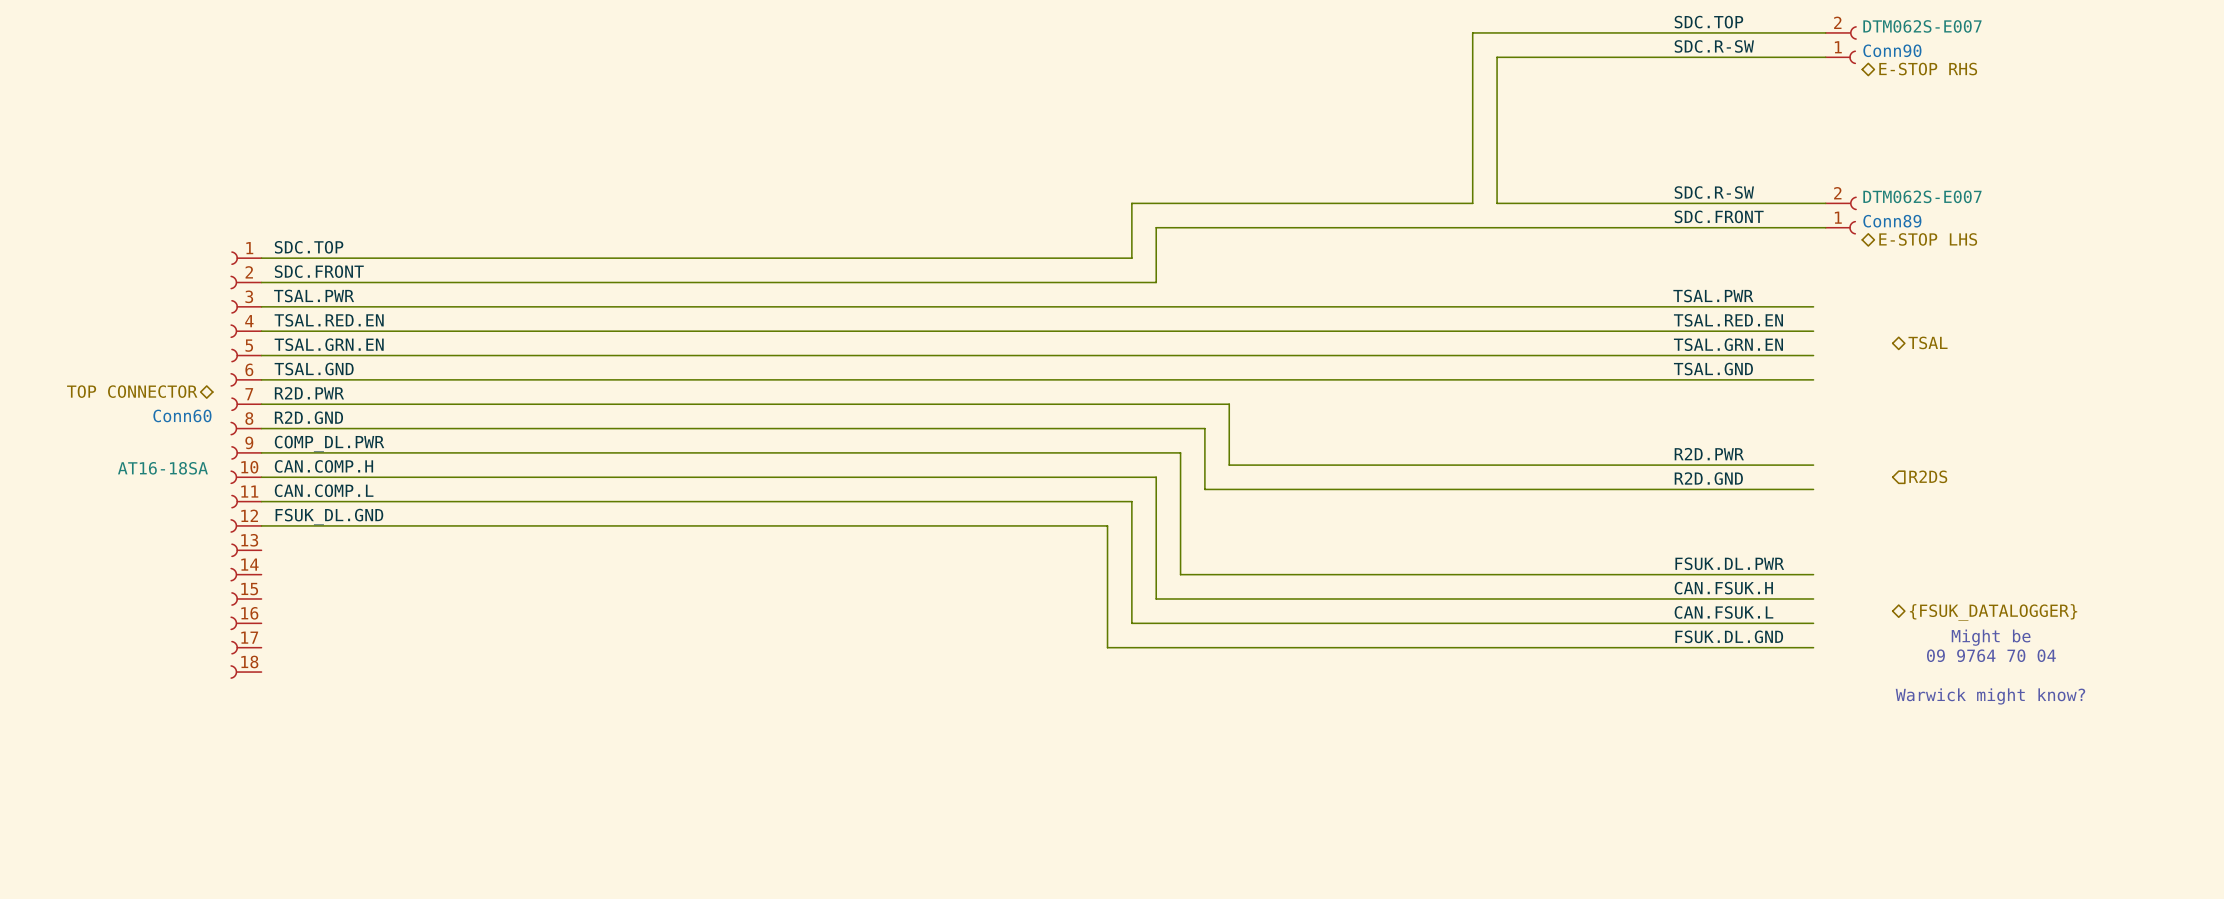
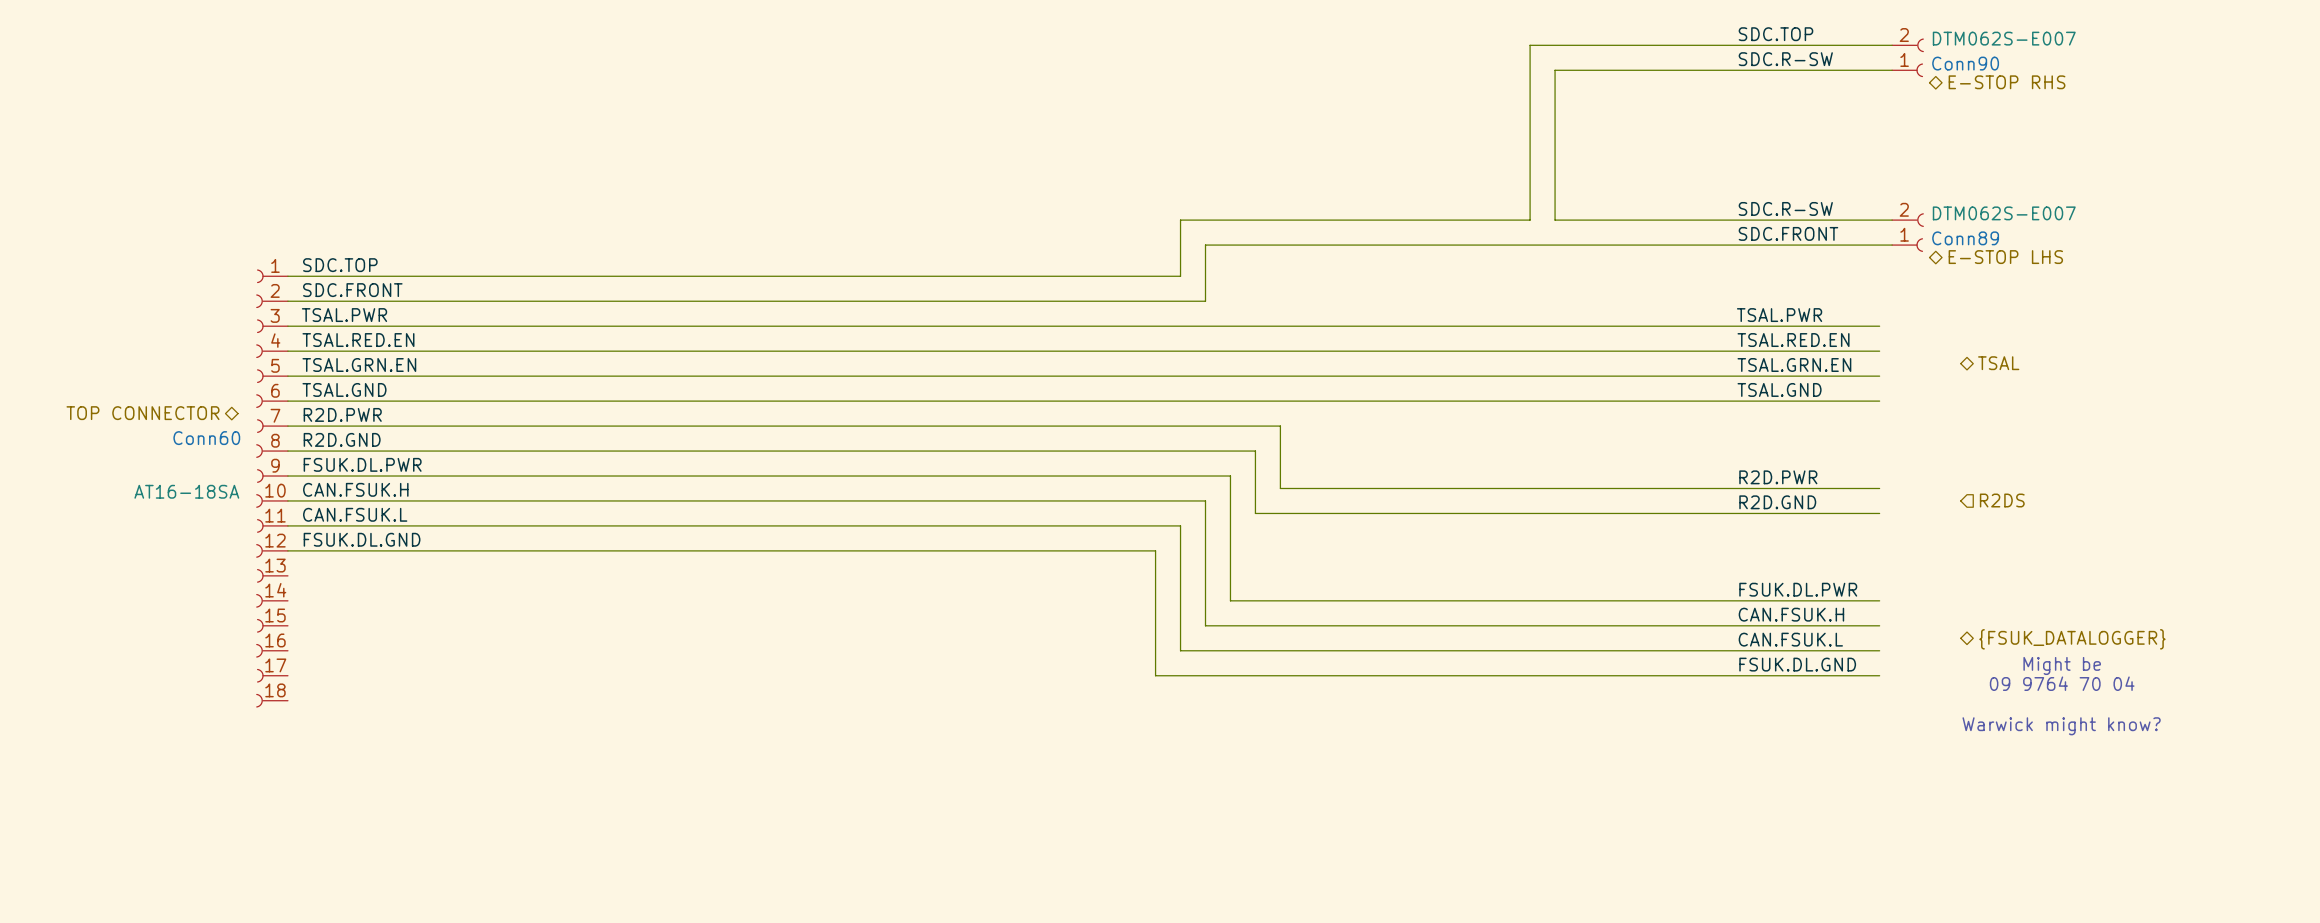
label: COMP_DL.PWR (329, 443) -> FSUK.DL.PWR (362, 464)
label: CAN.COMP.H (323, 466) -> CAN.FSUK.H (355, 489)
label: CAN.COMP.L (324, 490) -> CAN.FSUK.L (355, 514)
label: FSUK_DL.GND (329, 516) -> FSUK.DL.GND (362, 539)

